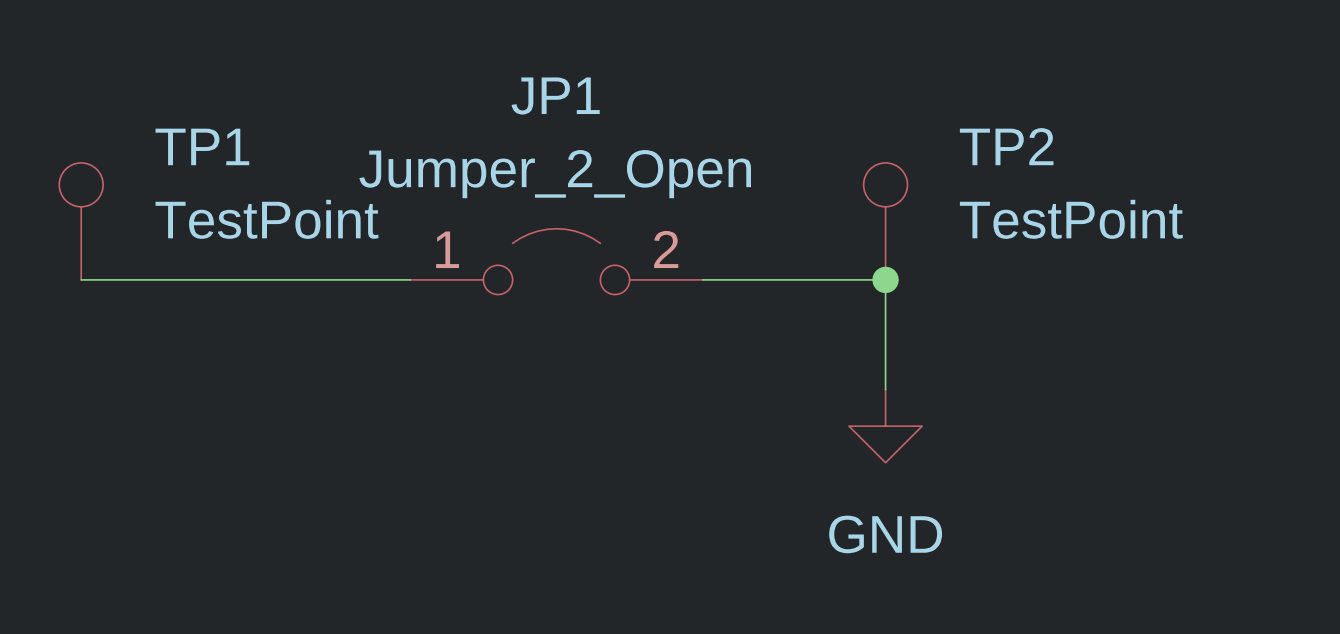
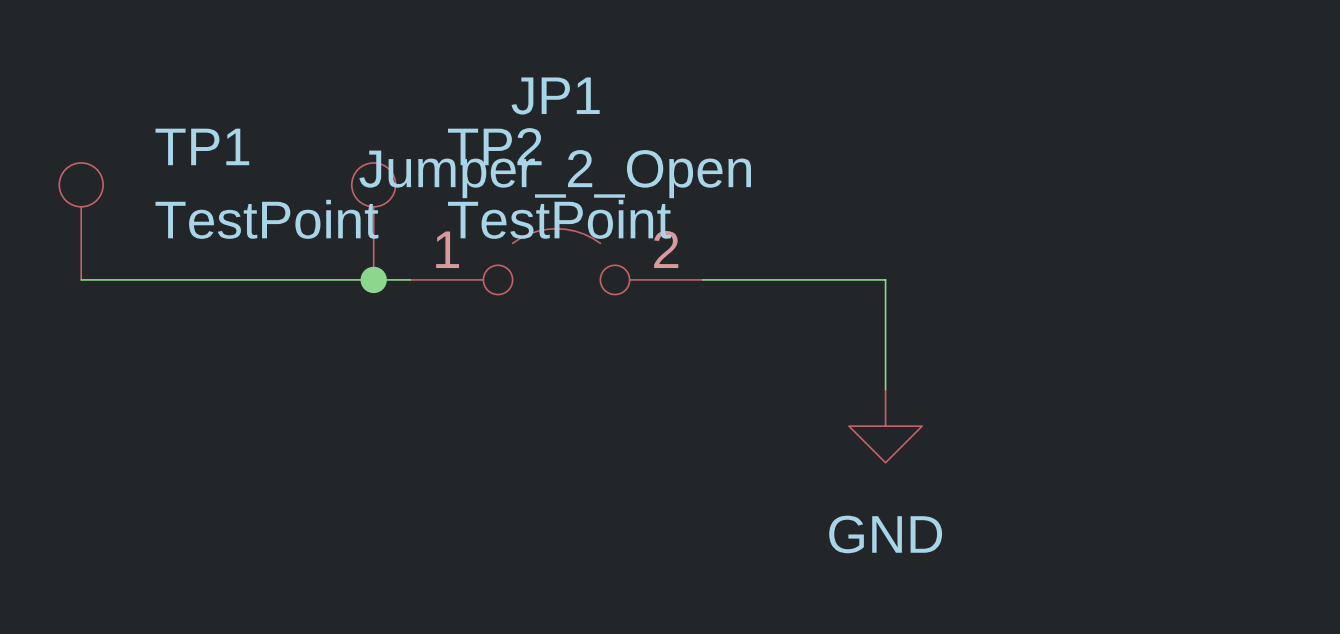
TP2 position: (885, 221) -> (373, 221)
junction: none -> (373, 279)
junction: (885, 279) -> none

